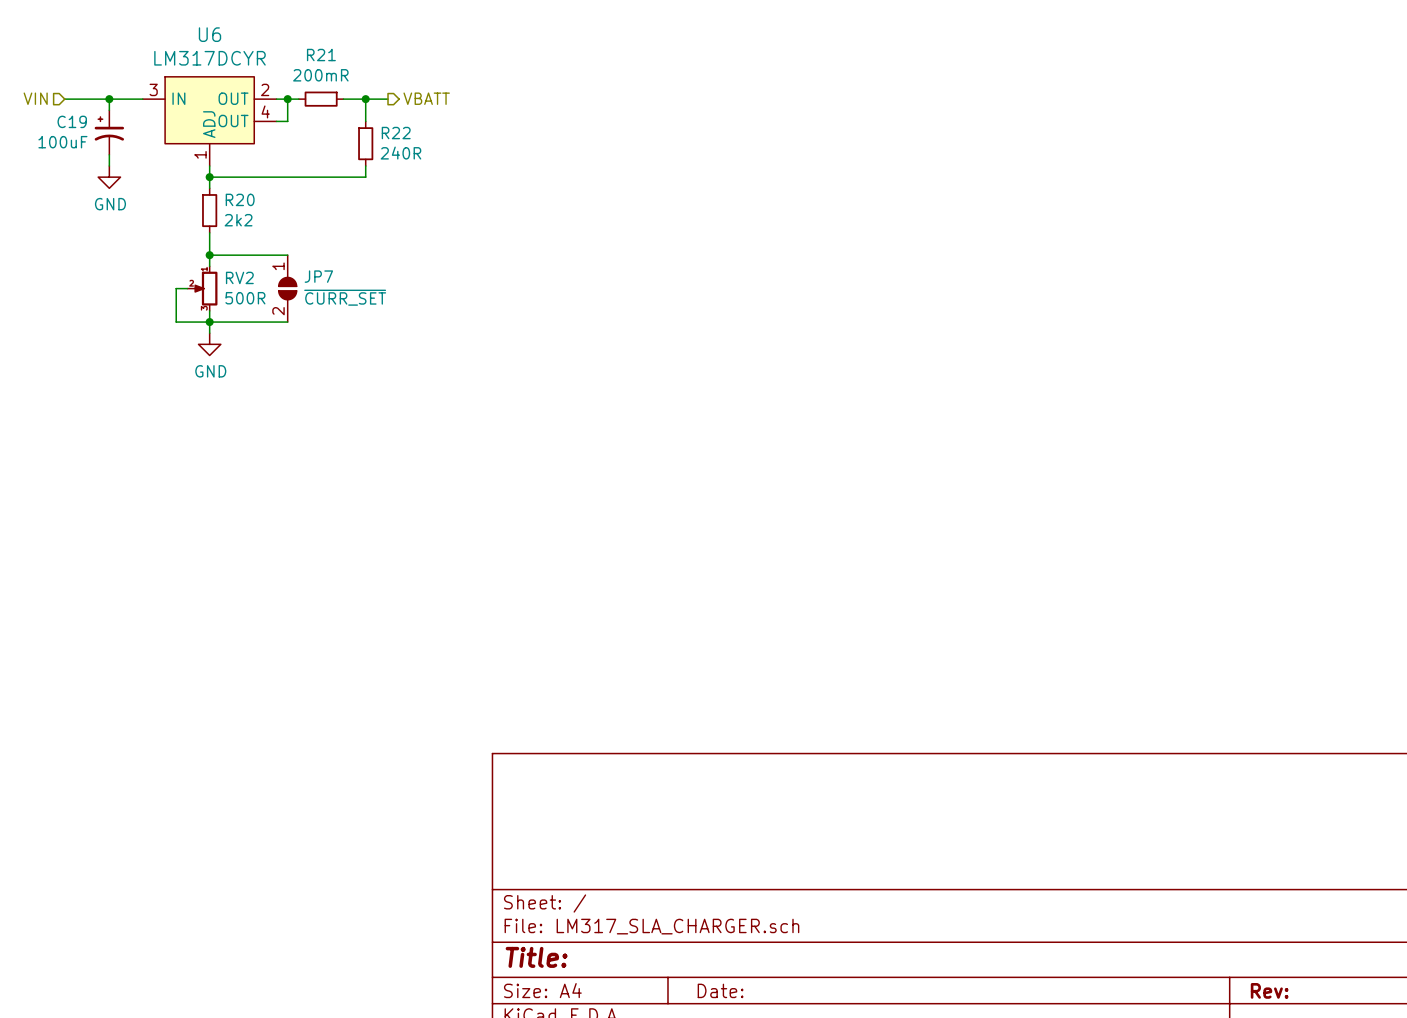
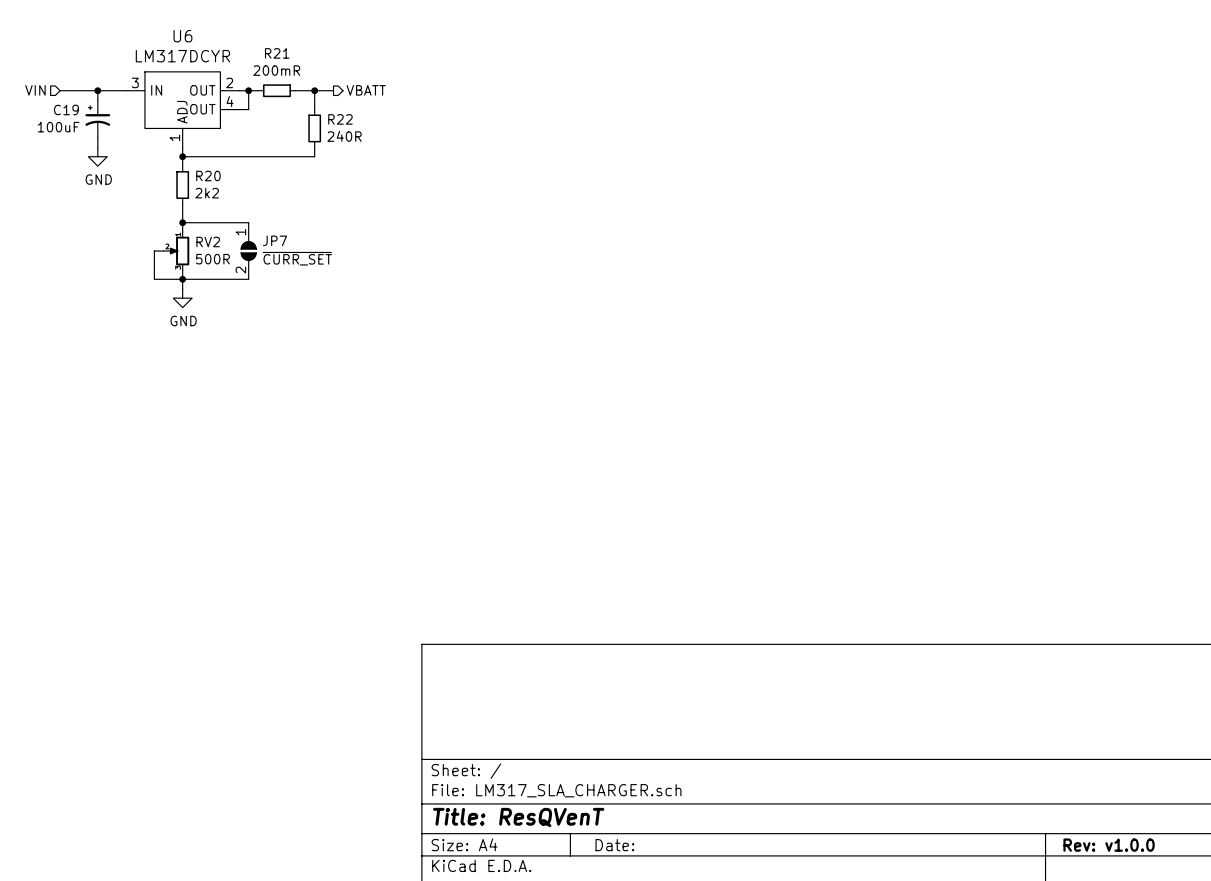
title block: Title: (536, 957) -> Title: ResQVenT (518, 817)
title block: Rev: (1269, 990) -> Rev: v1.0.0 (1109, 845)

